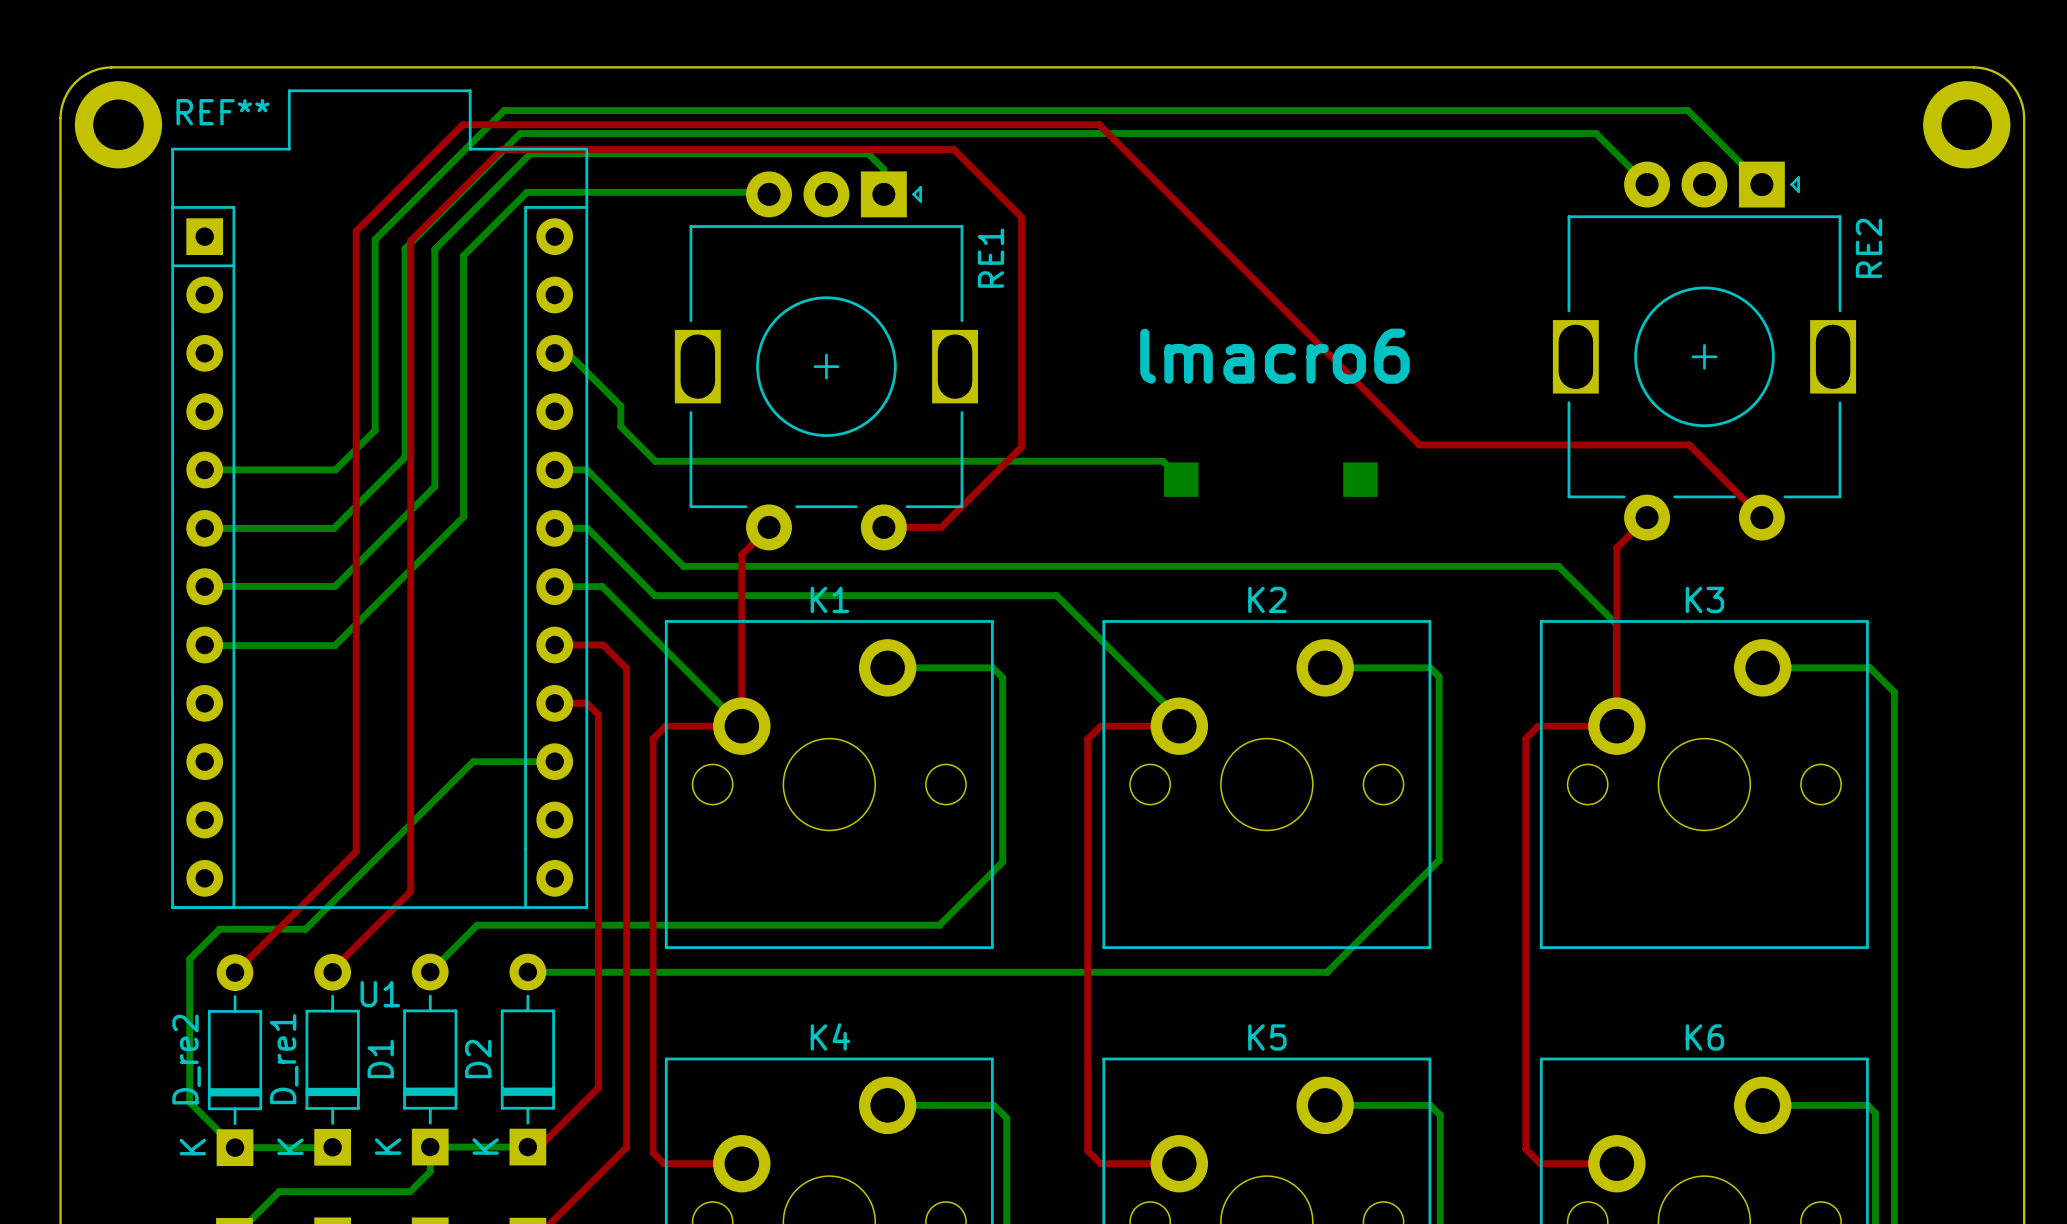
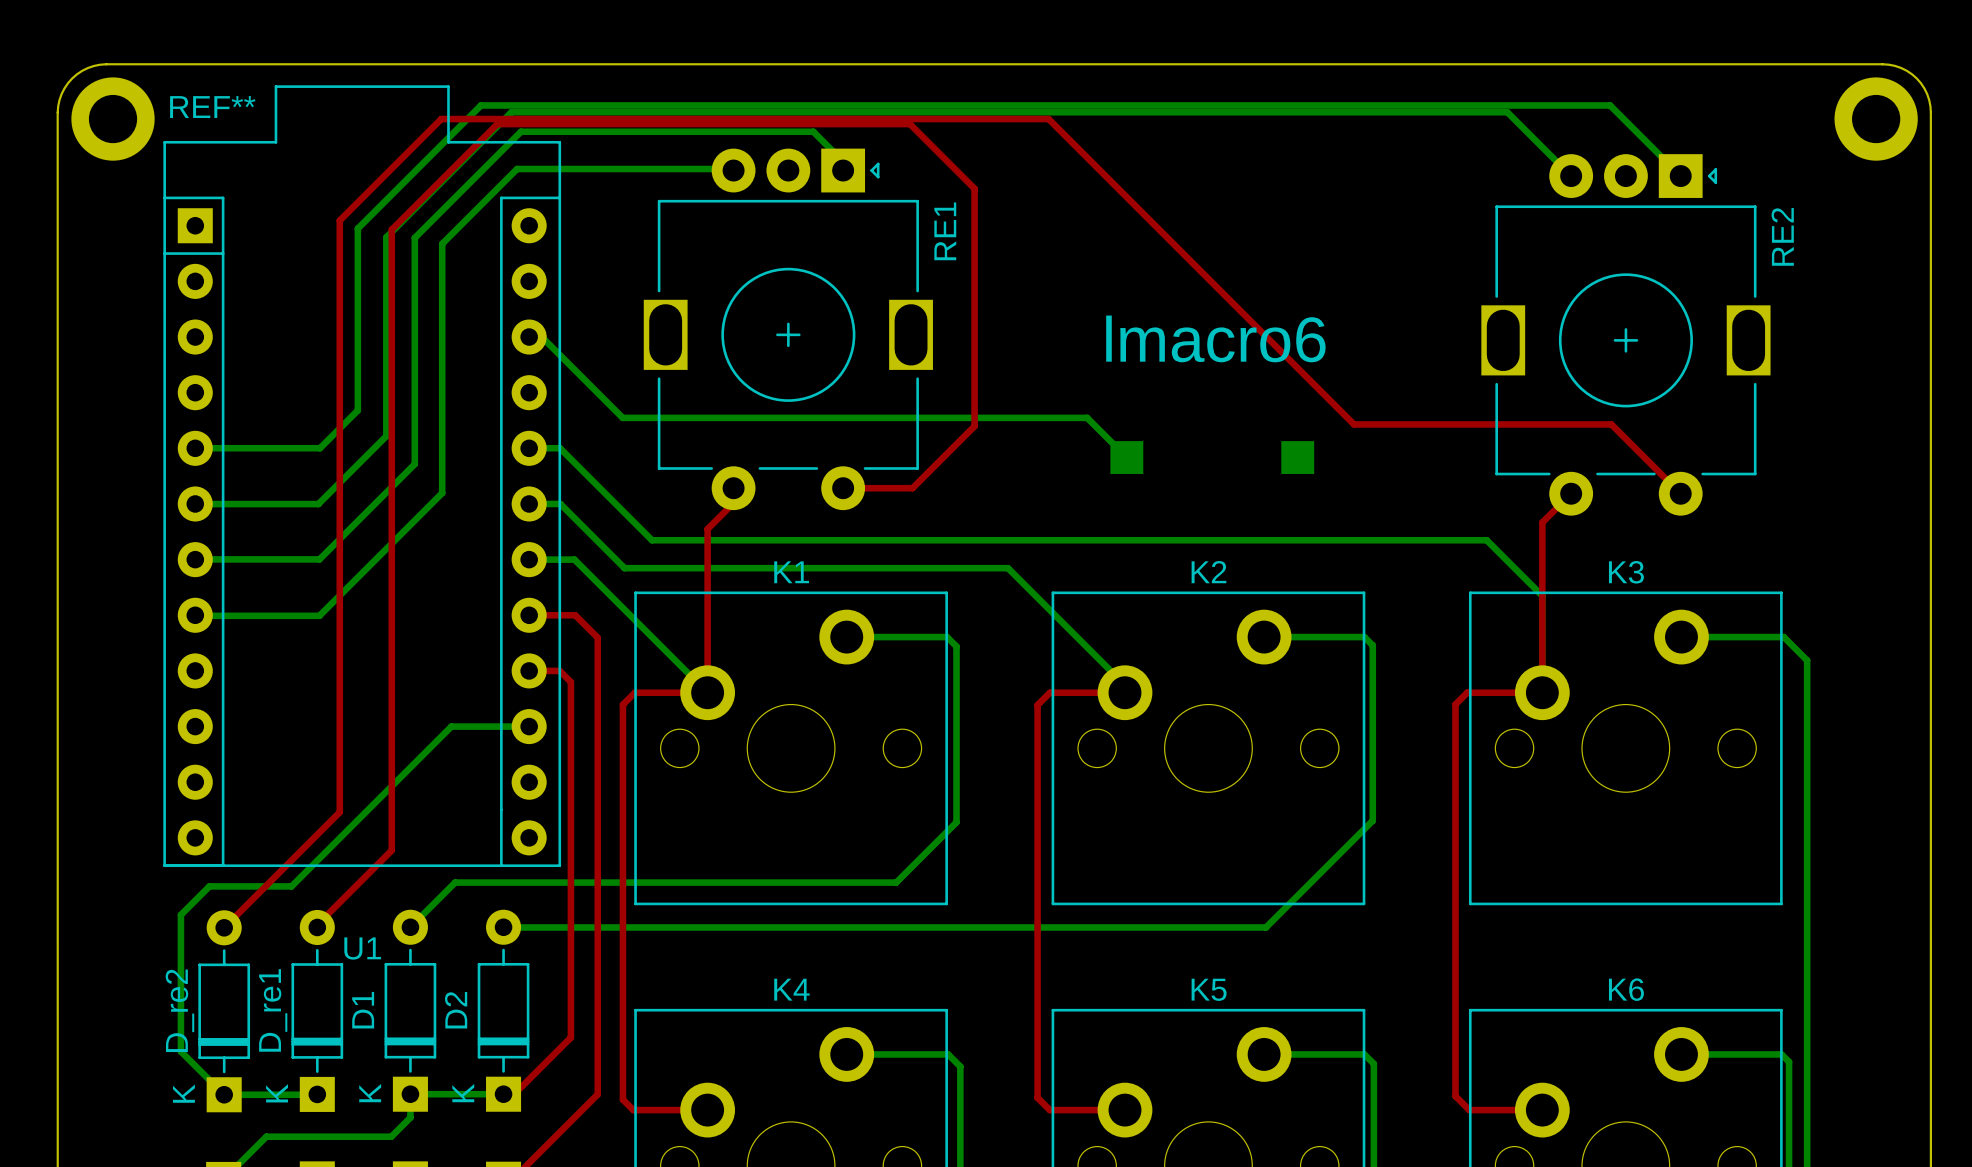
bottom track: (520, 133) (1596, 133) -> (496, 127) (511, 112) (1507, 112) (1522, 127)
top track: (501, 149) (953, 149) (1021, 217) -> (478, 142) (497, 124) (909, 124) (974, 188) (974, 207)
bottom track: (530, 153) (868, 153) -> (506, 146) (520, 131) (813, 131) (828, 146)
bottom track: (526, 192) (766, 192) -> (502, 183) (517, 168) (725, 168)
RE1 position: (826, 360) -> (788, 329)
bottom track: (620, 406) (620, 426) (655, 461) (1162, 461) -> (592, 387) (622, 417) (1087, 417) (1109, 440)
top track: (956, 511) (941, 527) (883, 527) -> (912, 488) (858, 488)

